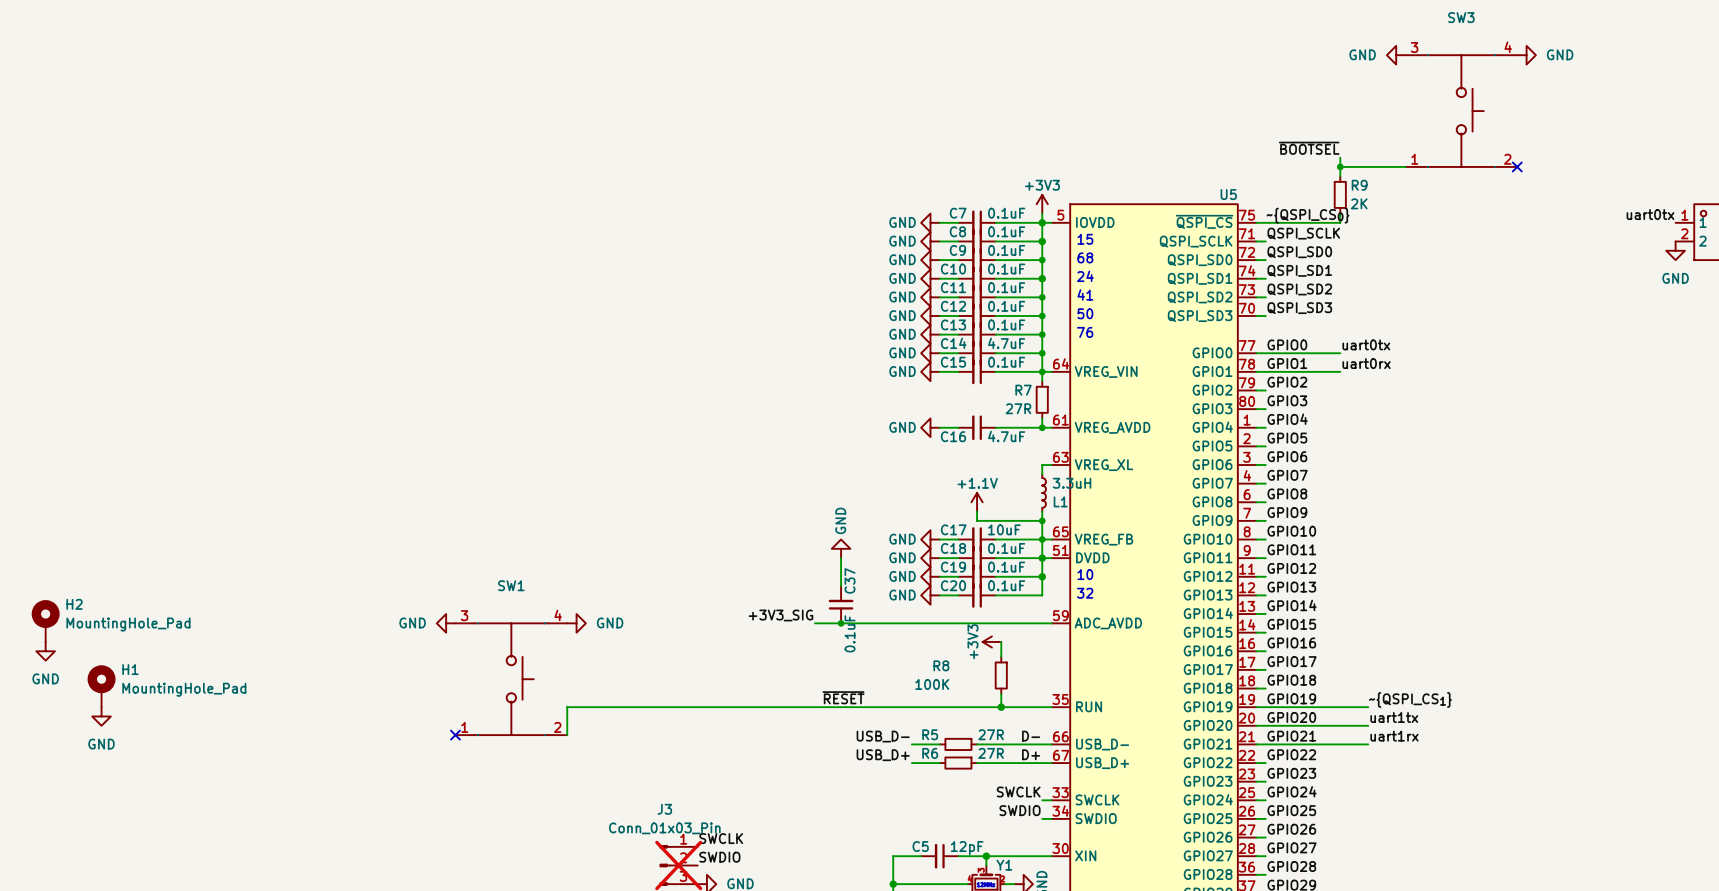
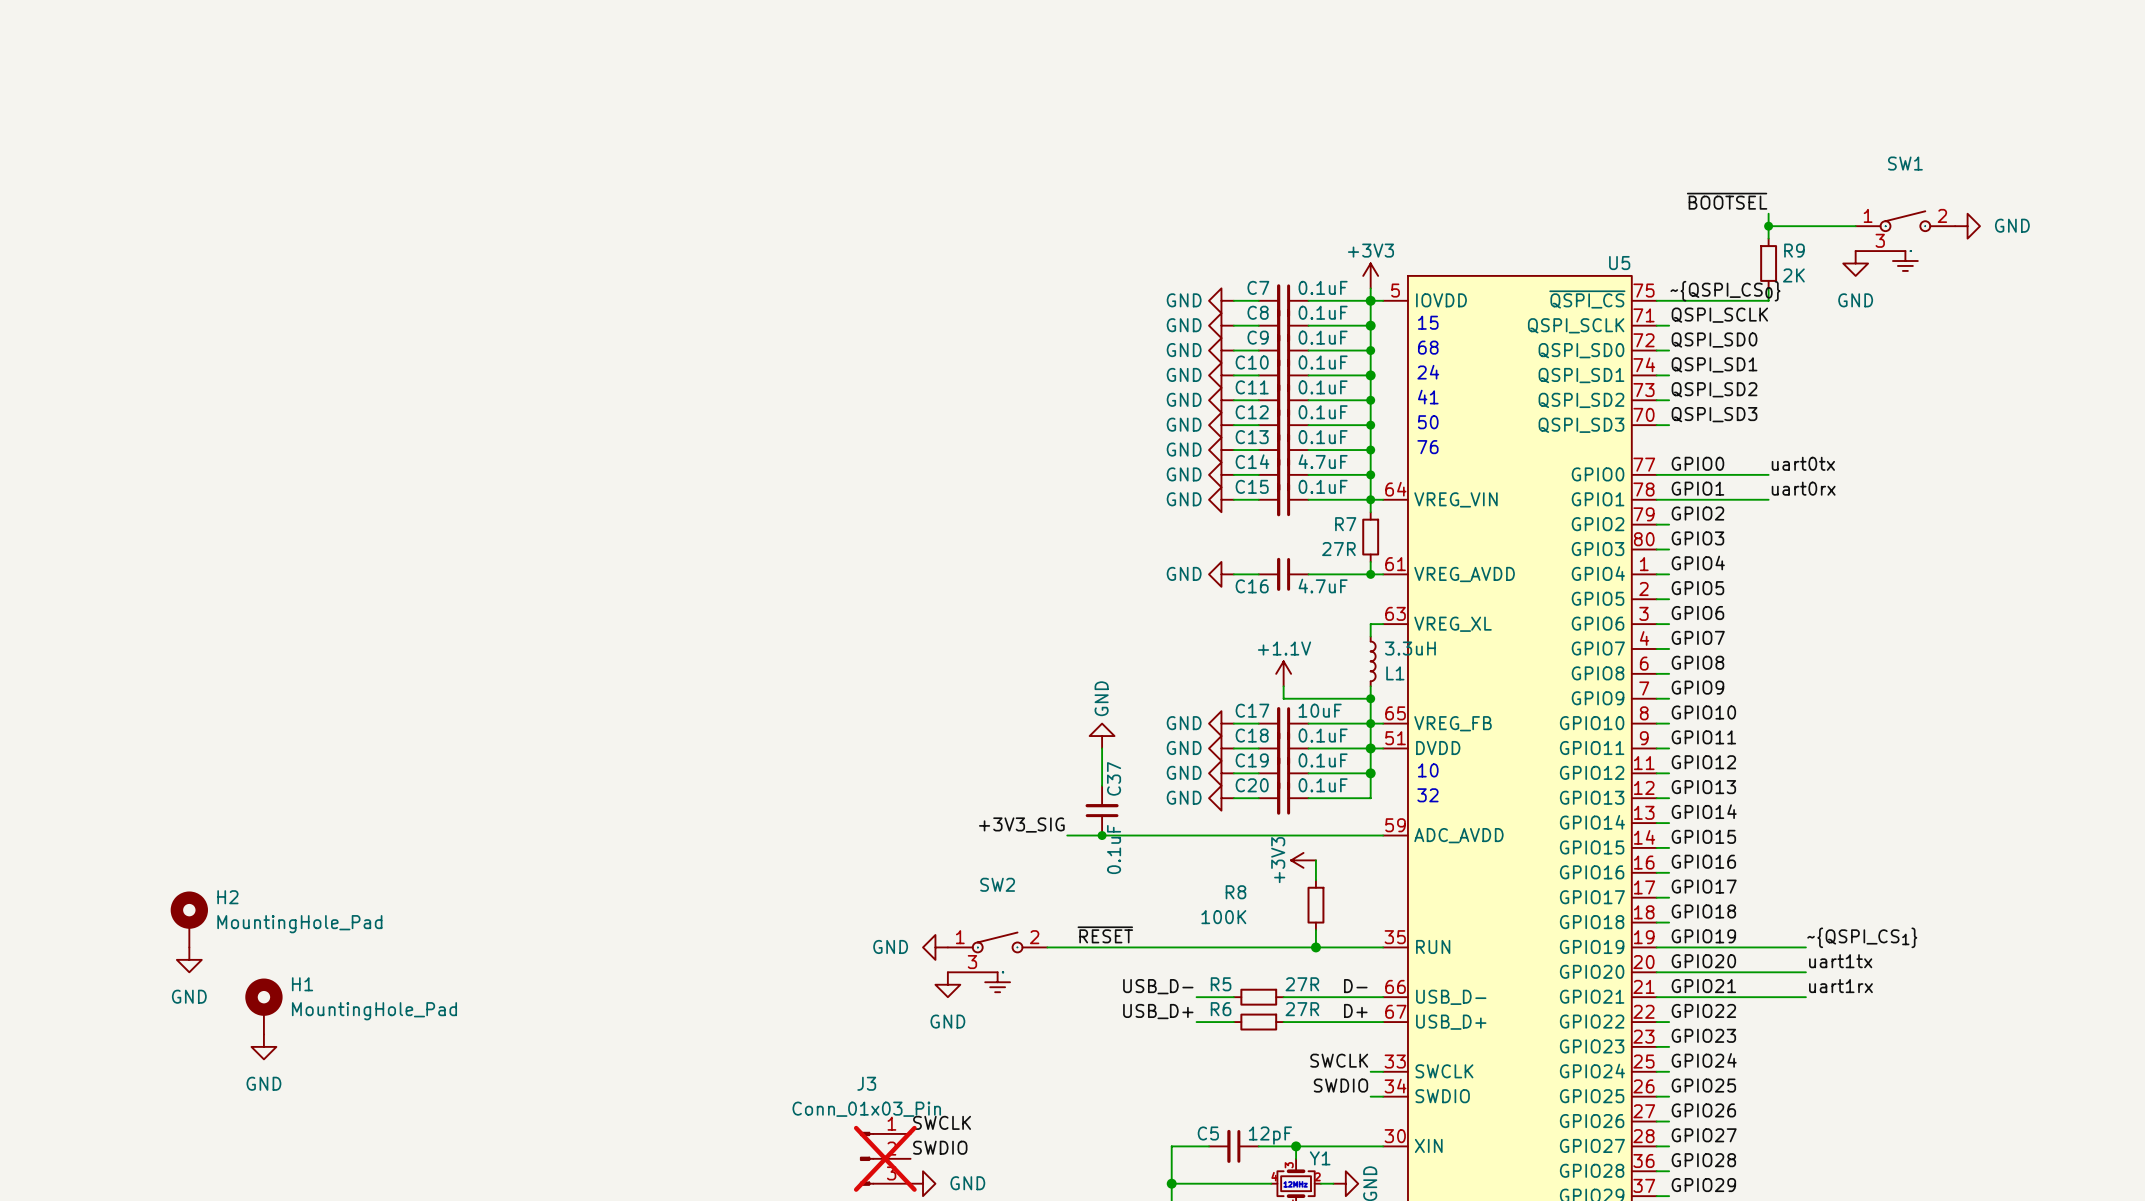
power symbol: GND (1396, 55) -> none
power symbol: GND (1526, 55) -> none
SW3: (1461, 111) -> none
power symbol: none -> GND (1967, 226)
no-connect mark: (1517, 166) -> none
power symbol: none -> GND (1855, 263)
SW1 name position: SW1 (511, 585) -> SW1 (1905, 163)
H2 position: (45, 621) -> (189, 919)
power symbol: GND (446, 623) -> none
SW1 symbol: [455, 623, 568, 736] -> [1855, 211, 1956, 271]
power symbol: GND (576, 623) -> none
power symbol: GND (45, 651) -> none
H1 position: (101, 686) -> (263, 1006)
power symbol: none -> GND (935, 947)
wire: (800, 707) (567, 707) (567, 735) -> none
power symbol position: GND (101, 716) -> GND (189, 959)
SW2: none -> (997, 962)
no-connect mark: (455, 735) -> none
power symbol: none -> GND (947, 984)
power symbol: none -> GND (263, 1046)

